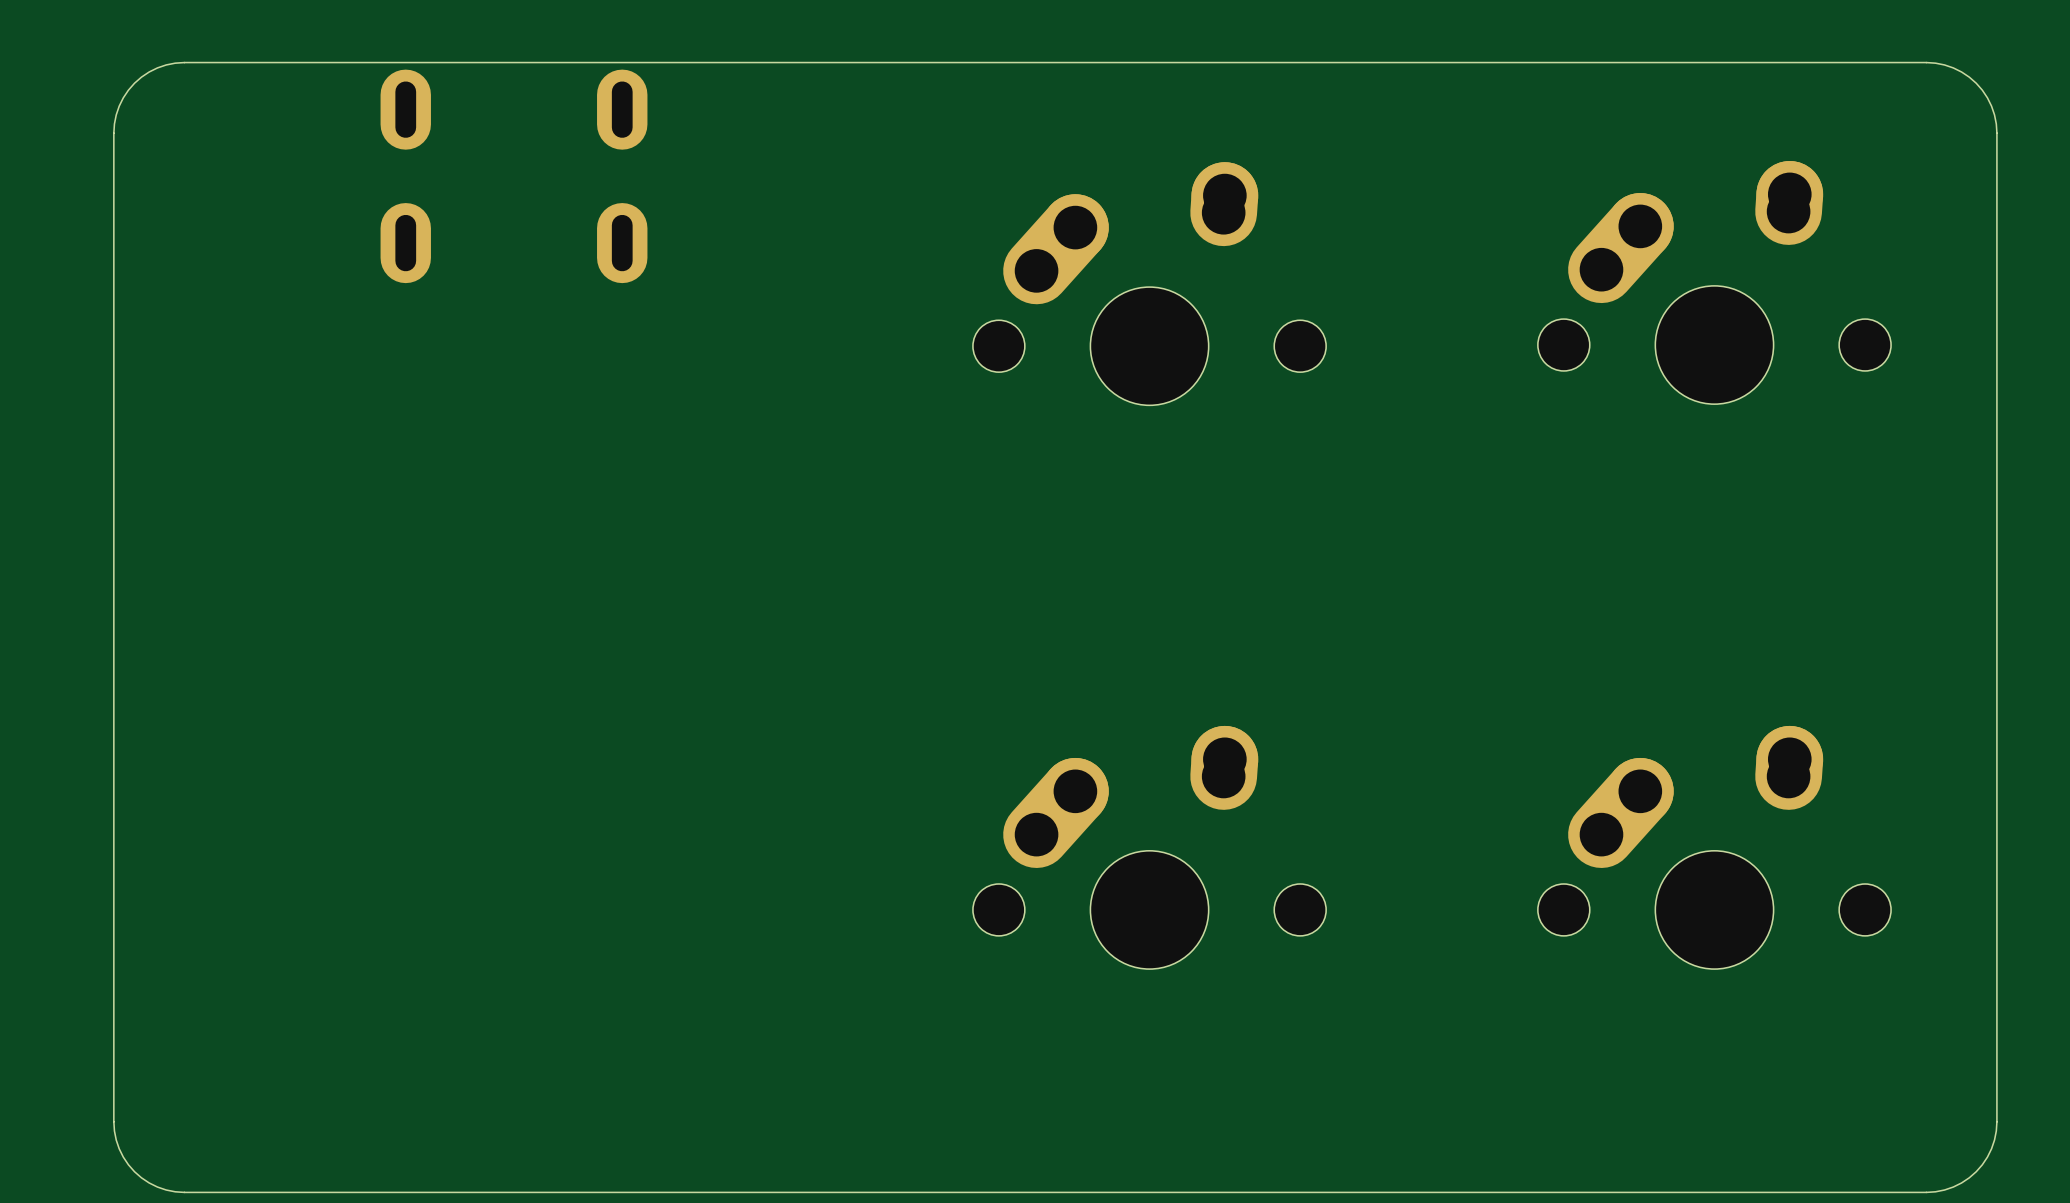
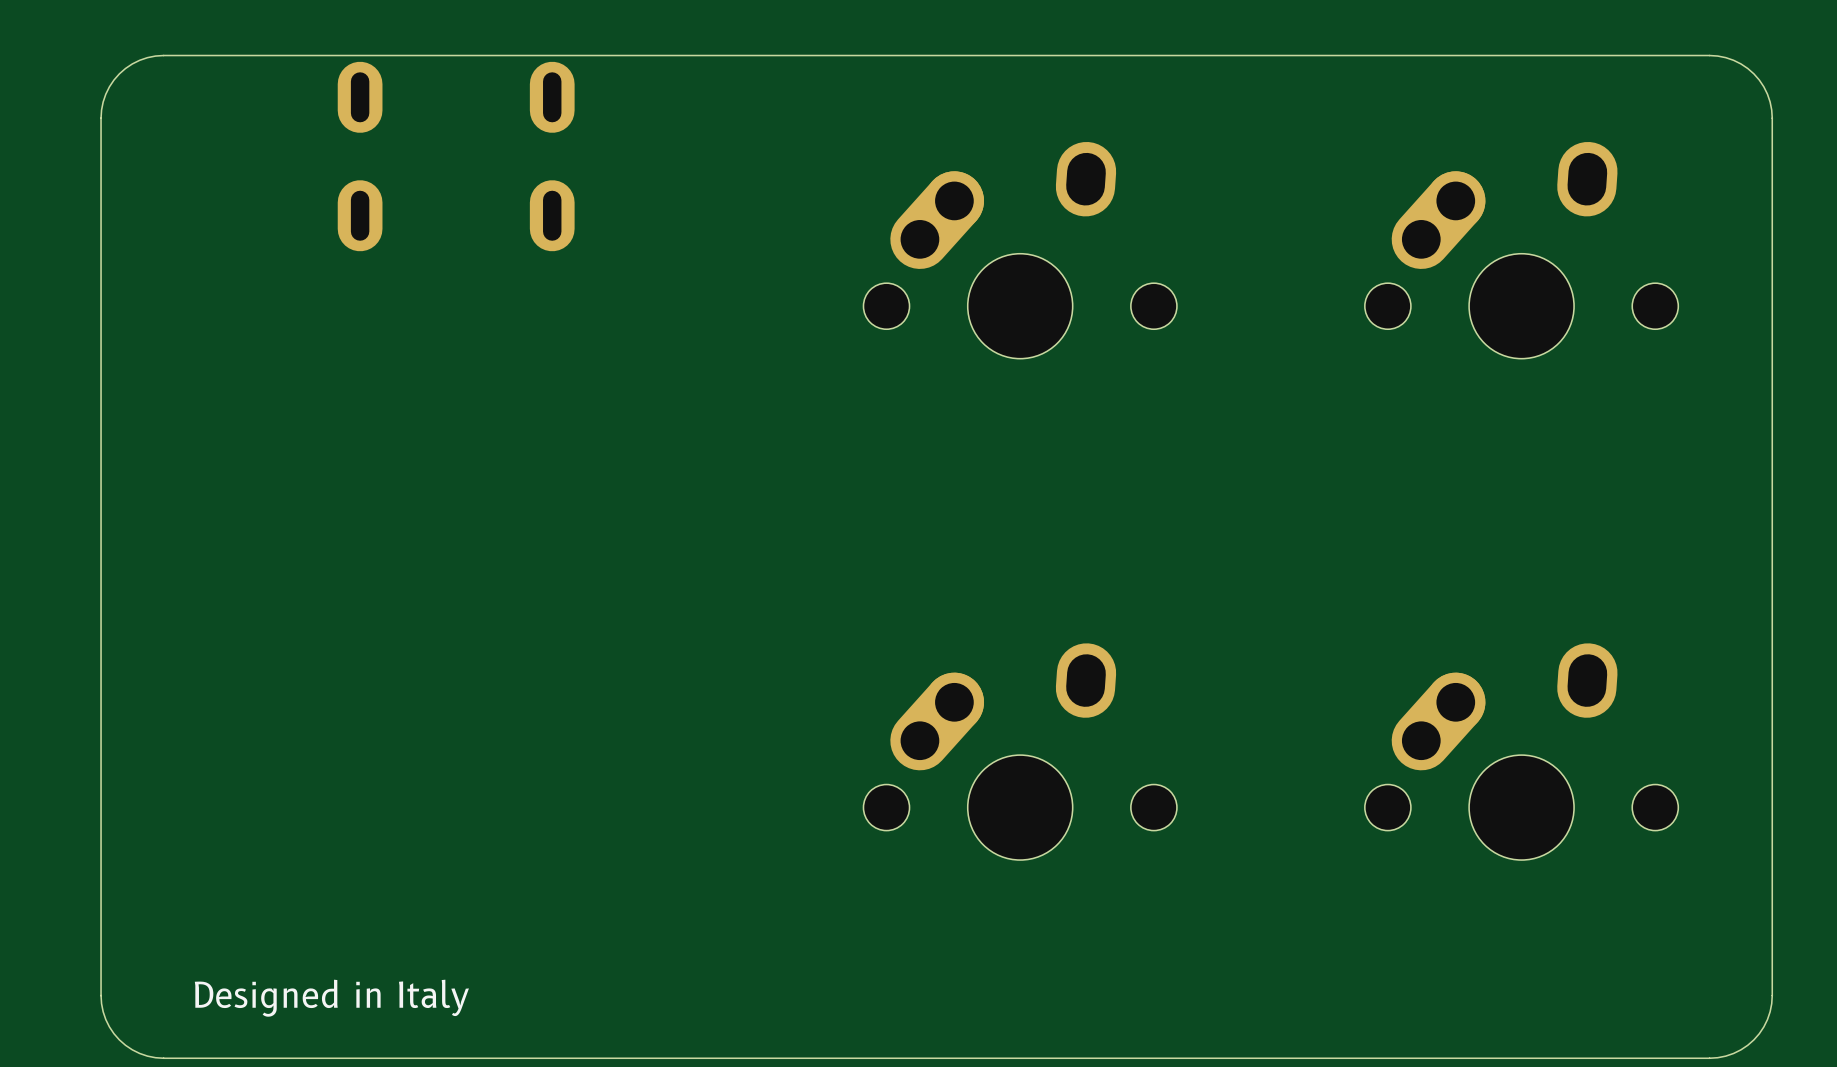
part footprint: [1537, 161, 1892, 405] -> [1364, 141, 1679, 359]
part footprint: [972, 162, 1327, 406] -> [863, 141, 1177, 359]
part footprint: [972, 725, 1327, 970] -> [863, 643, 1177, 861]
part footprint: [1537, 725, 1892, 970] -> [1364, 643, 1679, 861]
text: none -> Designed in Italy (331, 998)

